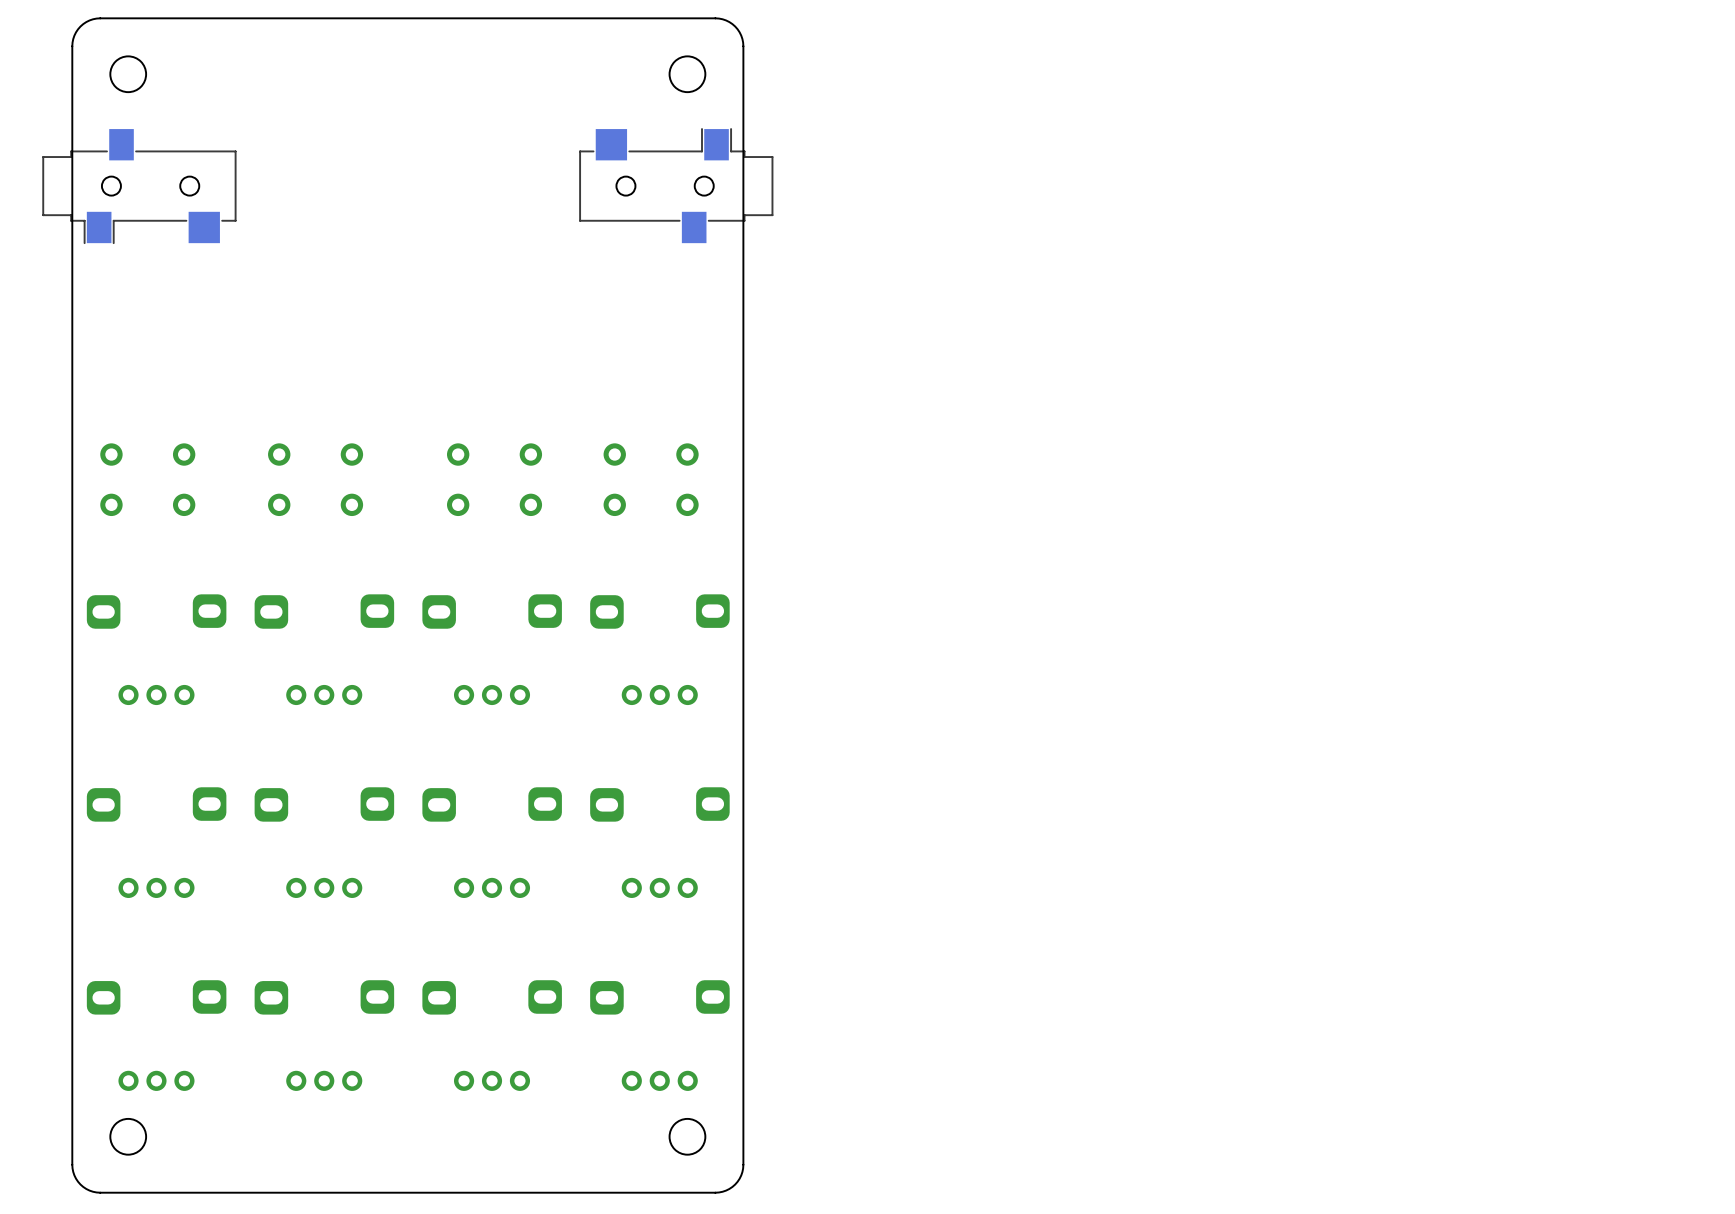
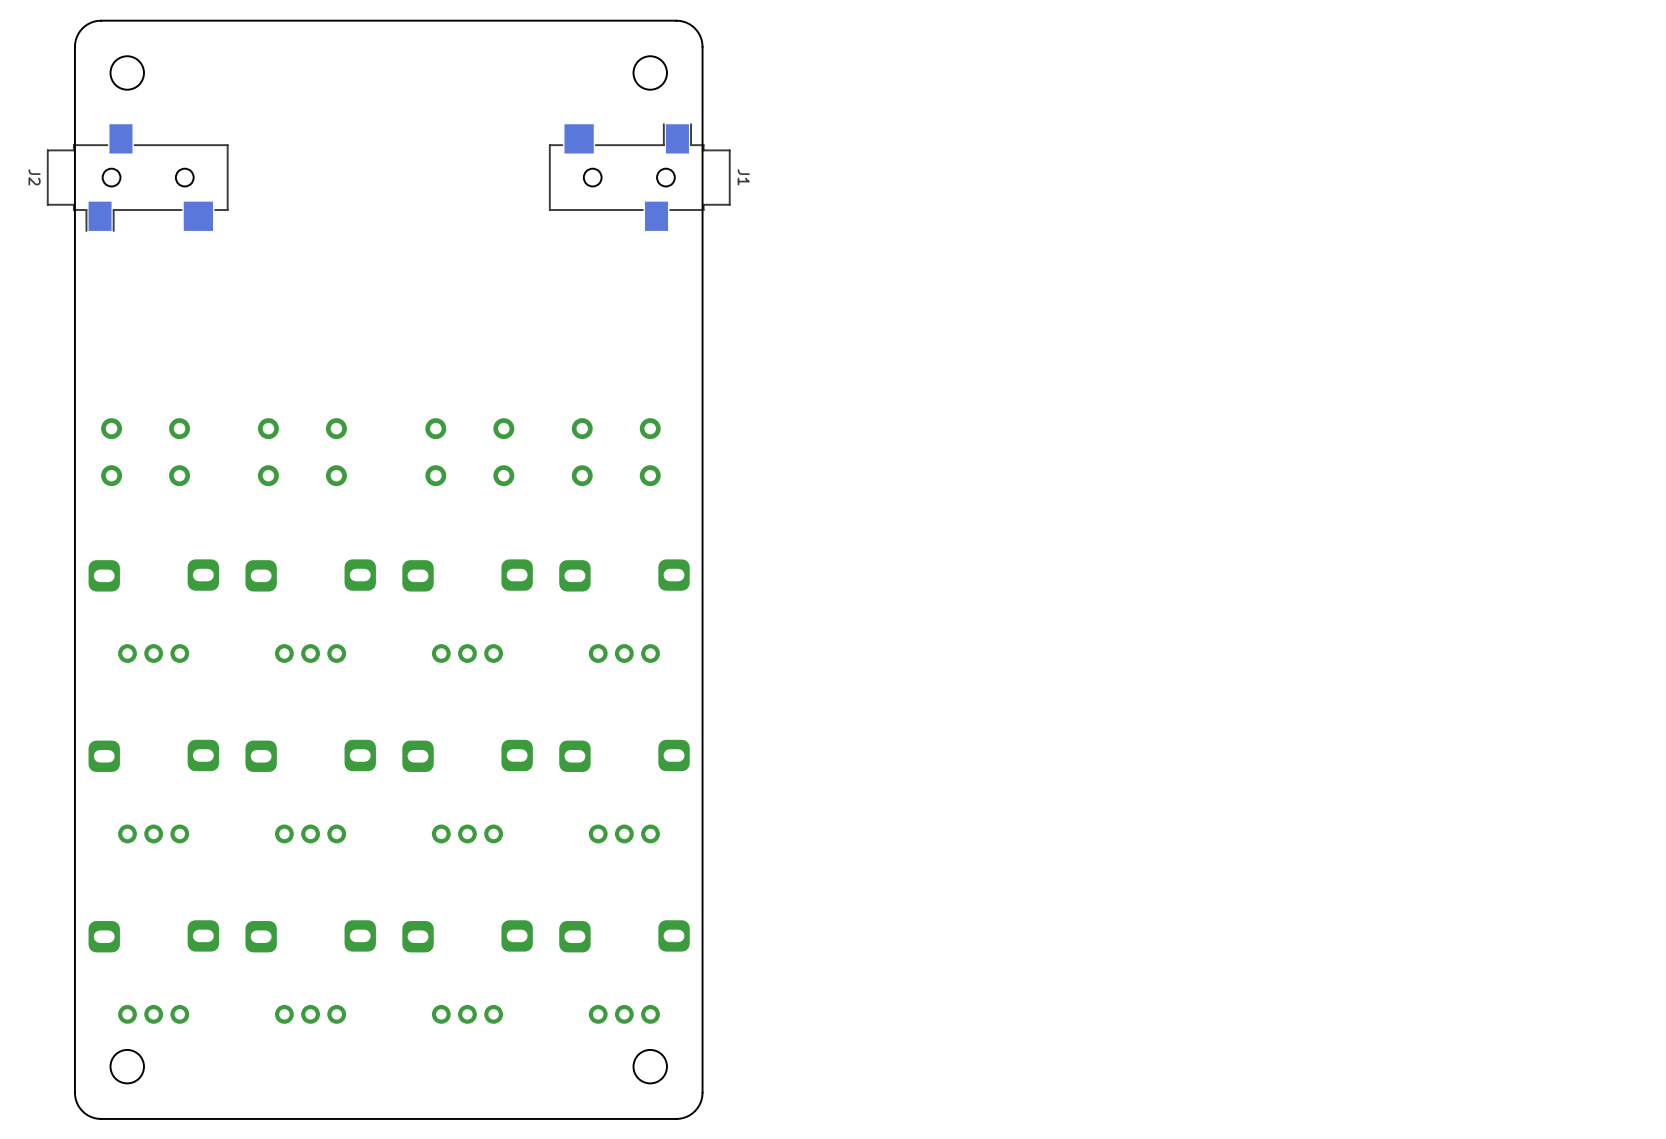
J2 name: none -> J2 (34, 177)
J1 name: none -> J1 (743, 177)

